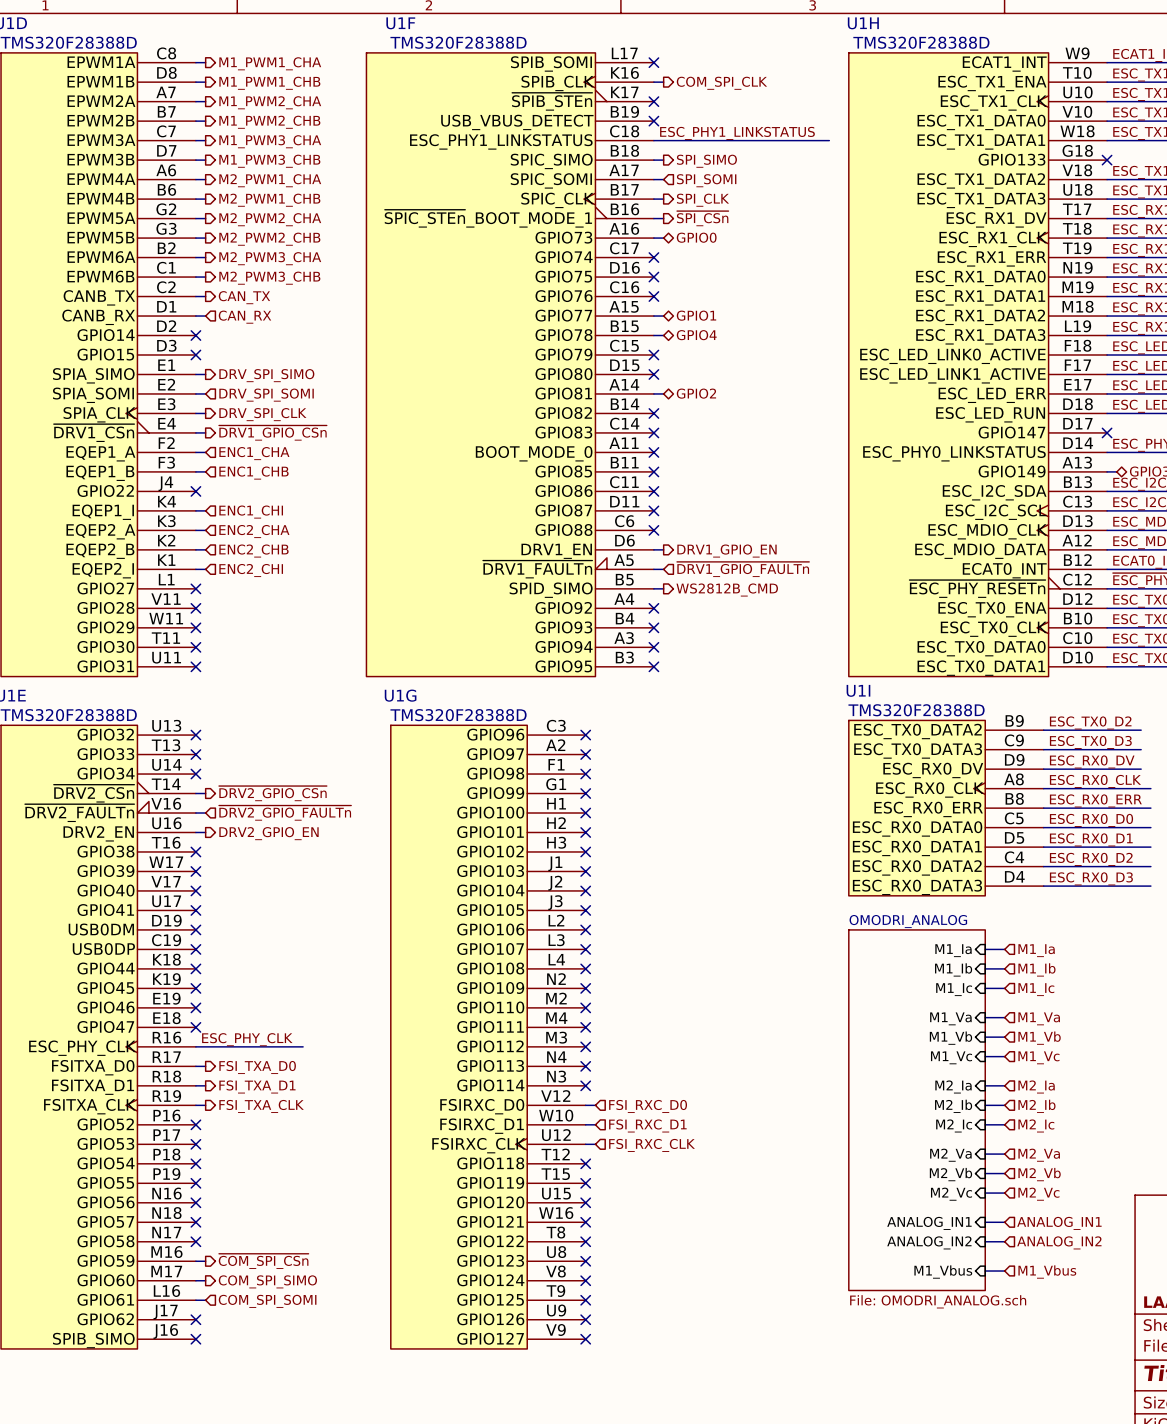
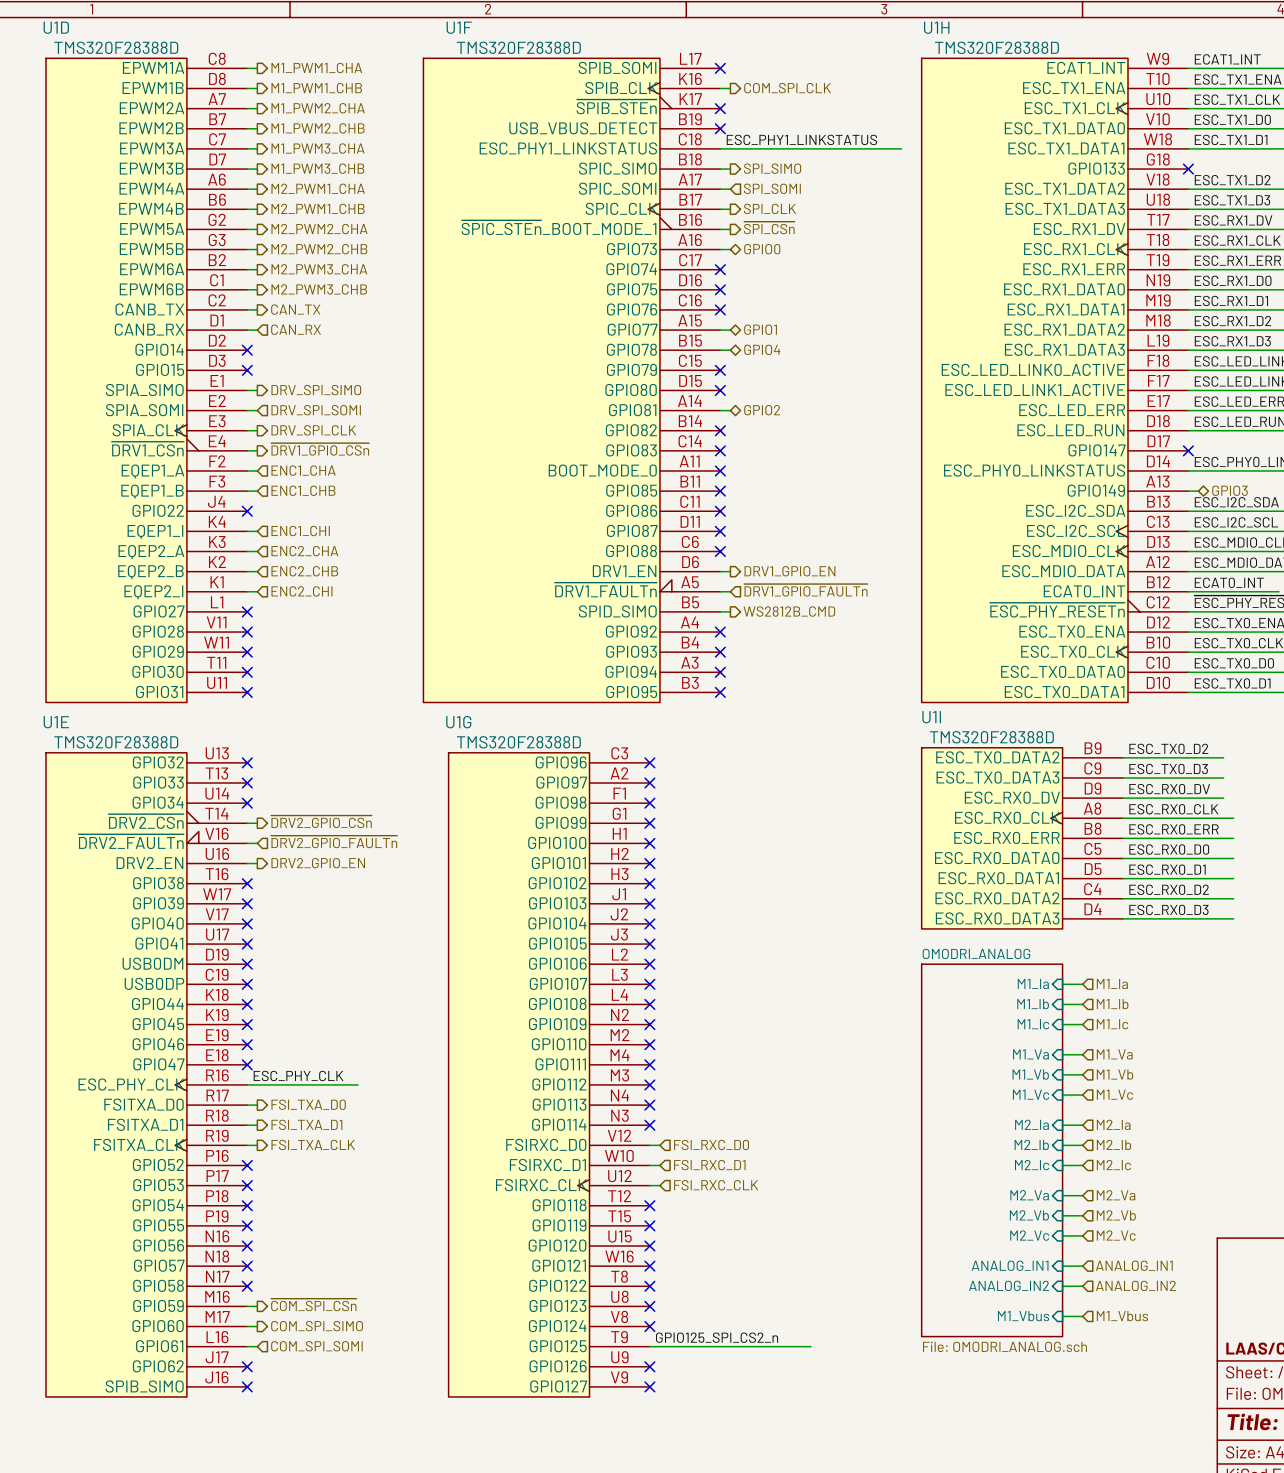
label: none -> GPIO125_SPI_CS2_n (717, 1337)
wire: none -> (649, 1346) (810, 1346)
no-connect mark: (585, 1300) -> none

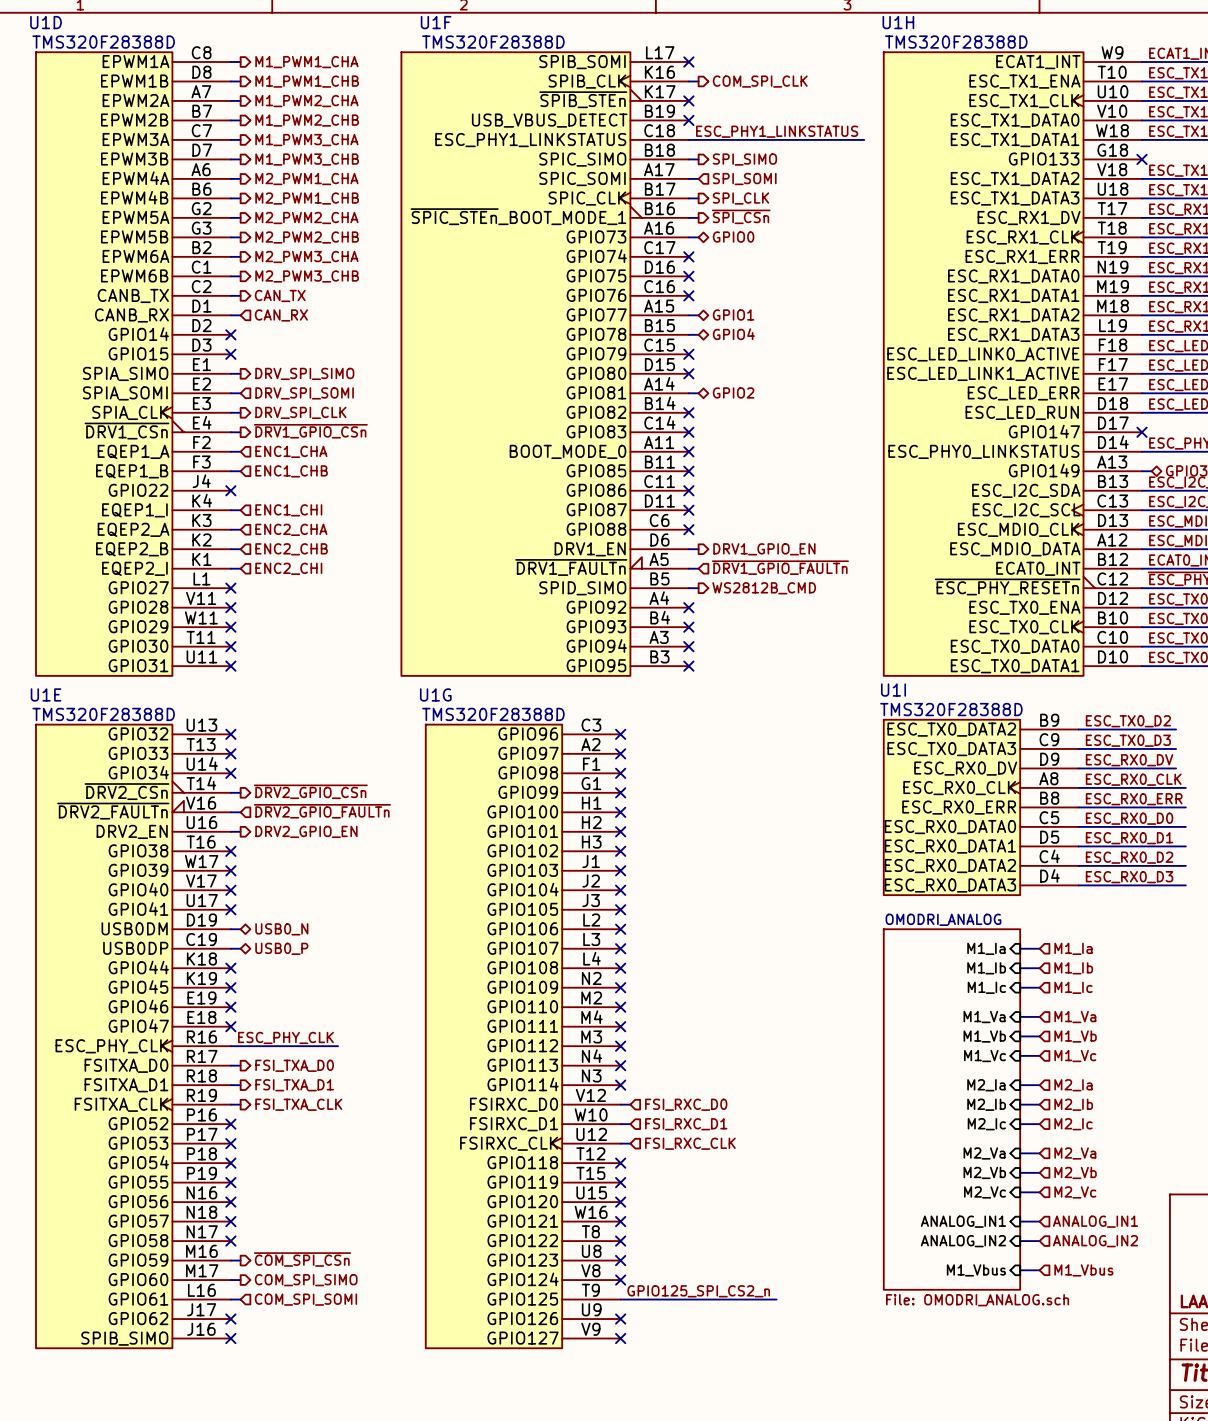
hierarchical label: none -> USB0_N (281, 929)
wire: none -> (230, 929) (240, 929)
no-connect mark: (247, 964) -> none
hierarchical label: none -> USB0_P (281, 948)
wire: none -> (230, 948) (240, 948)
no-connect mark: (247, 984) -> none

